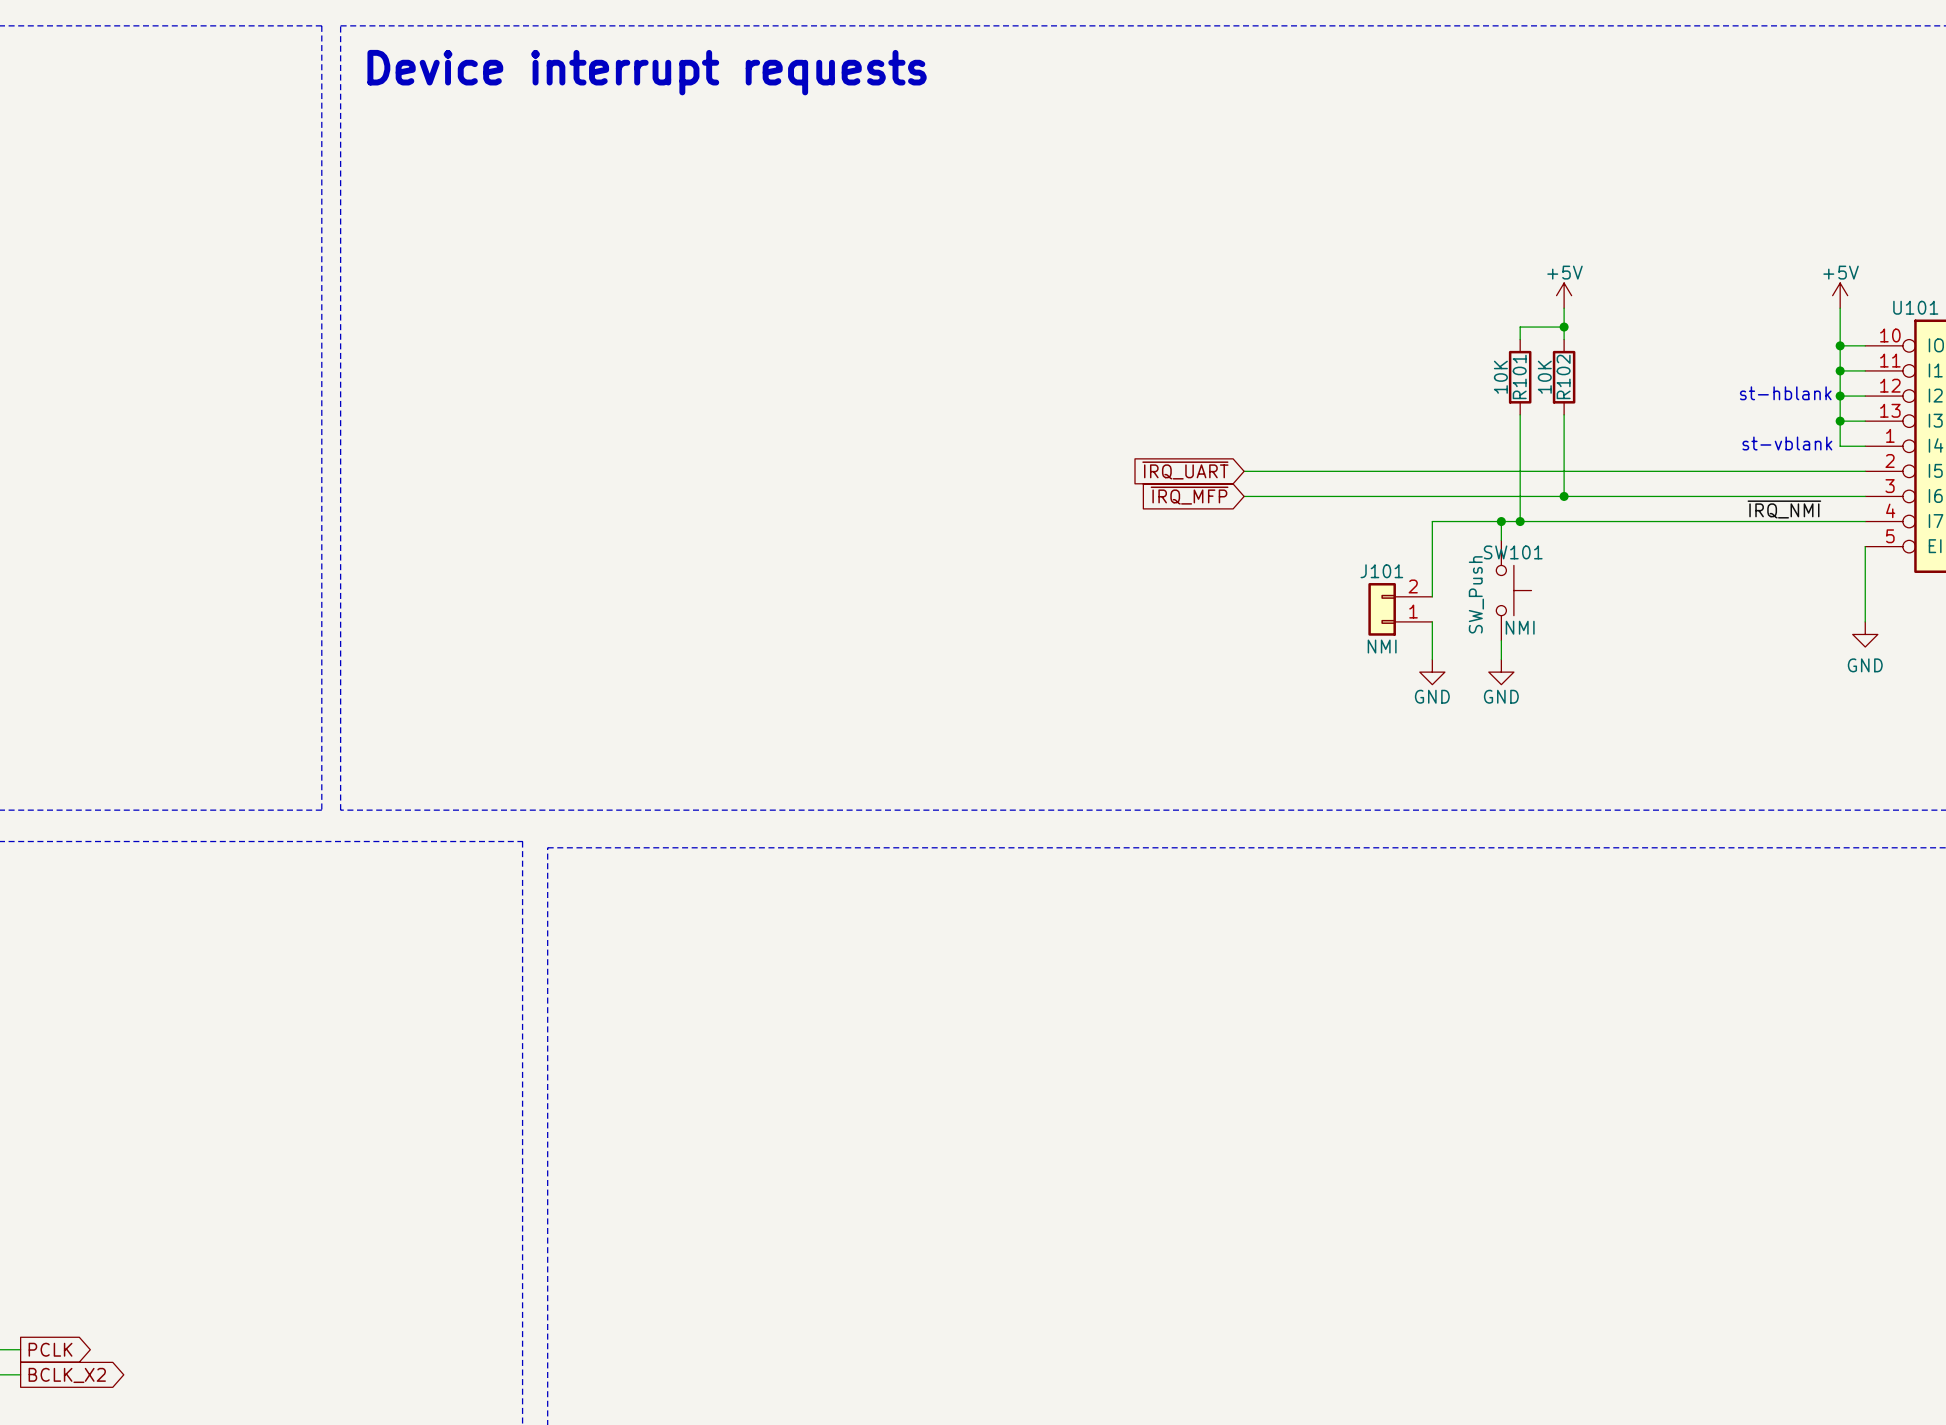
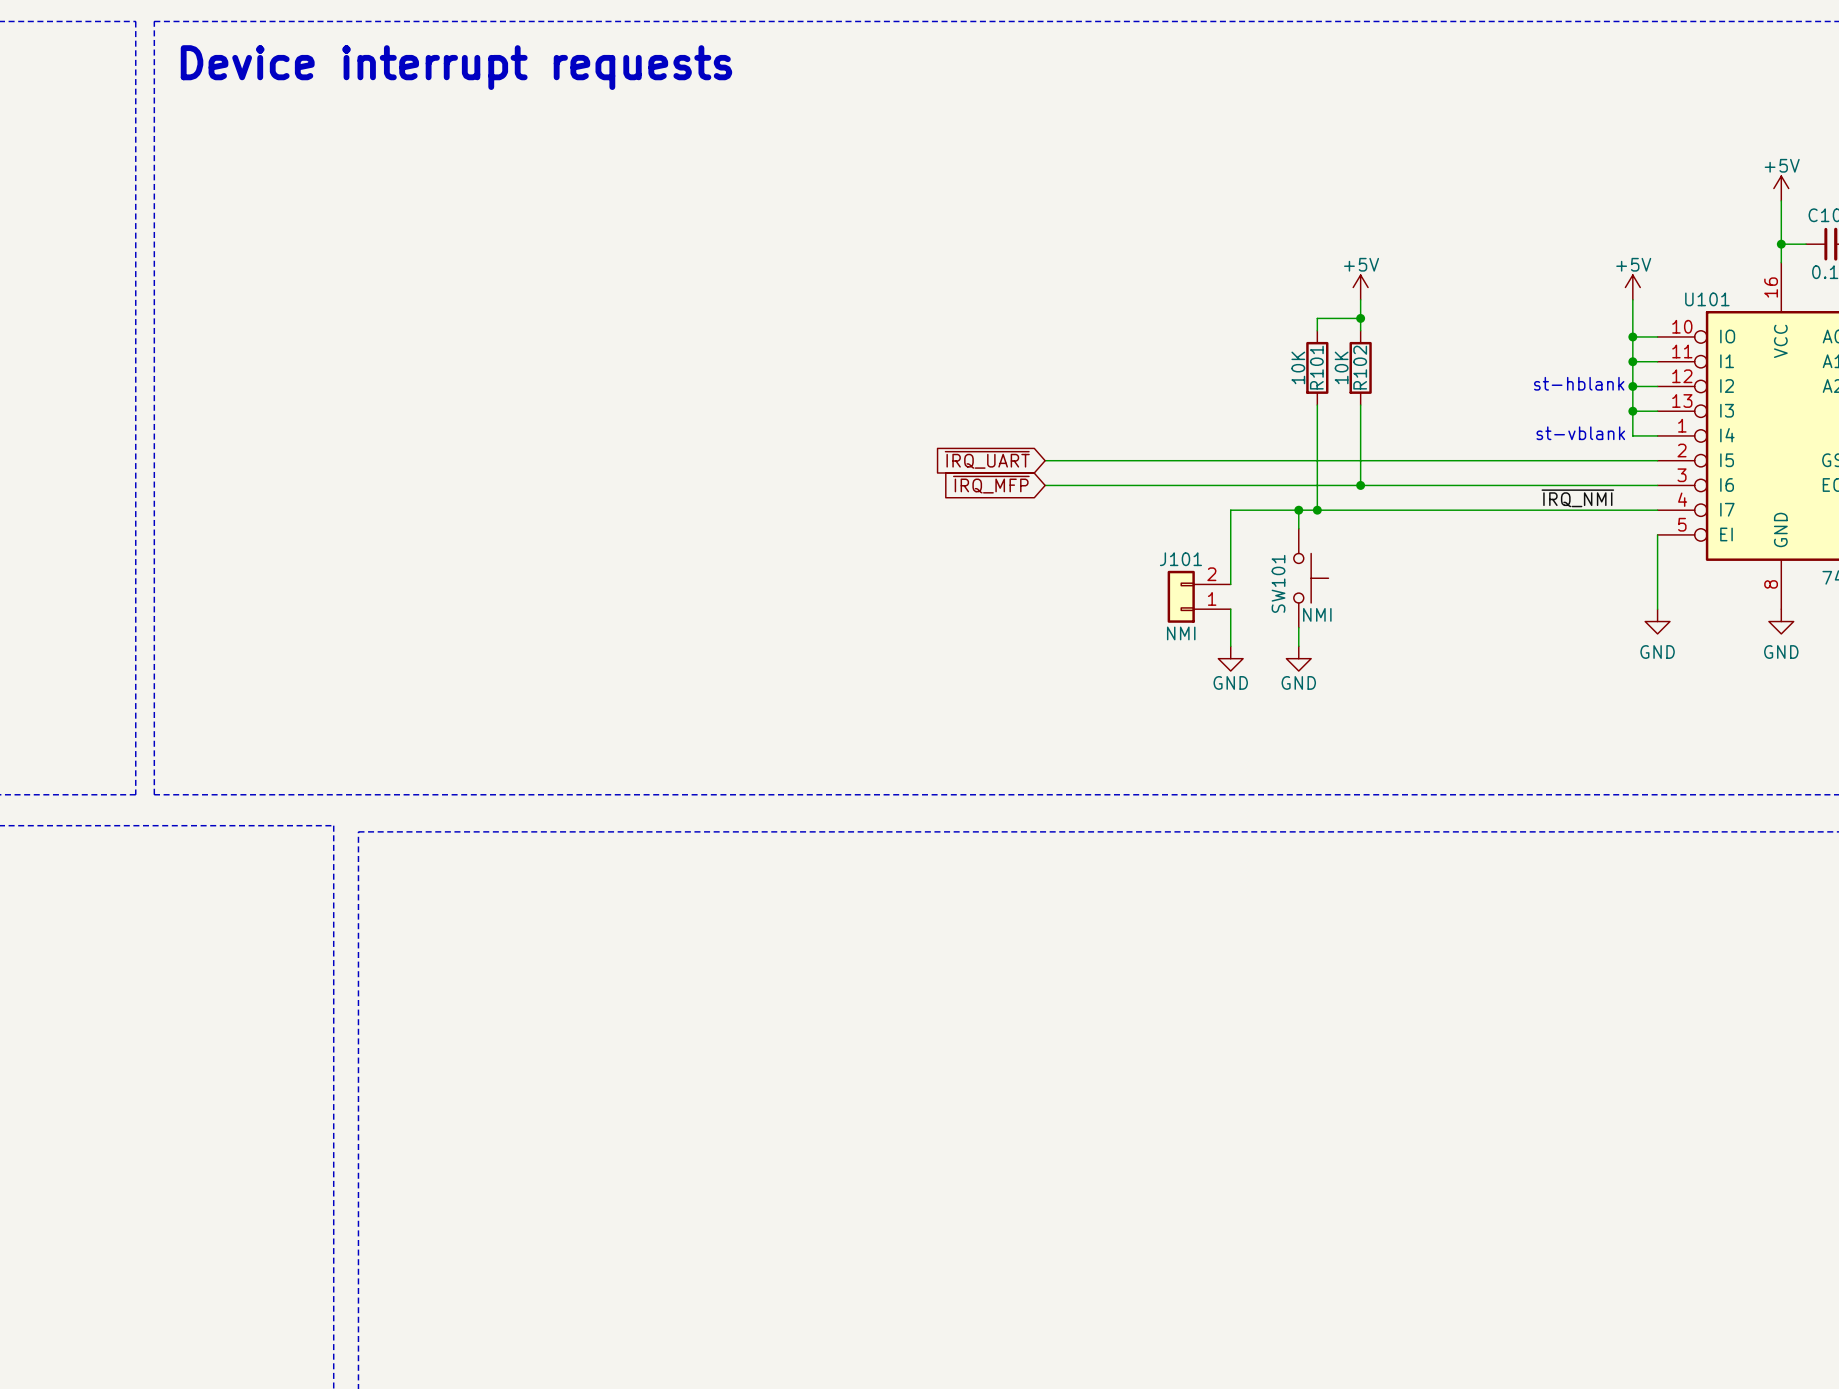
SW101 name rotation: 0° (1513, 552) -> 90° counterclockwise (1278, 583)
SW101 value: SW_Push (1476, 594) -> none

